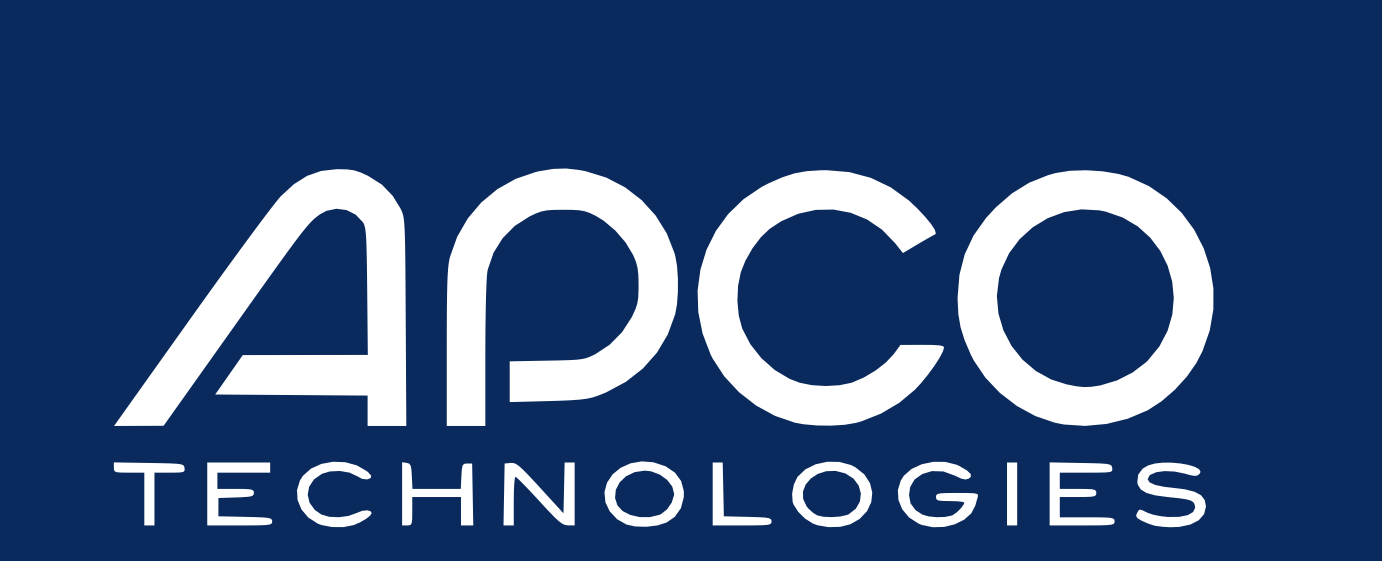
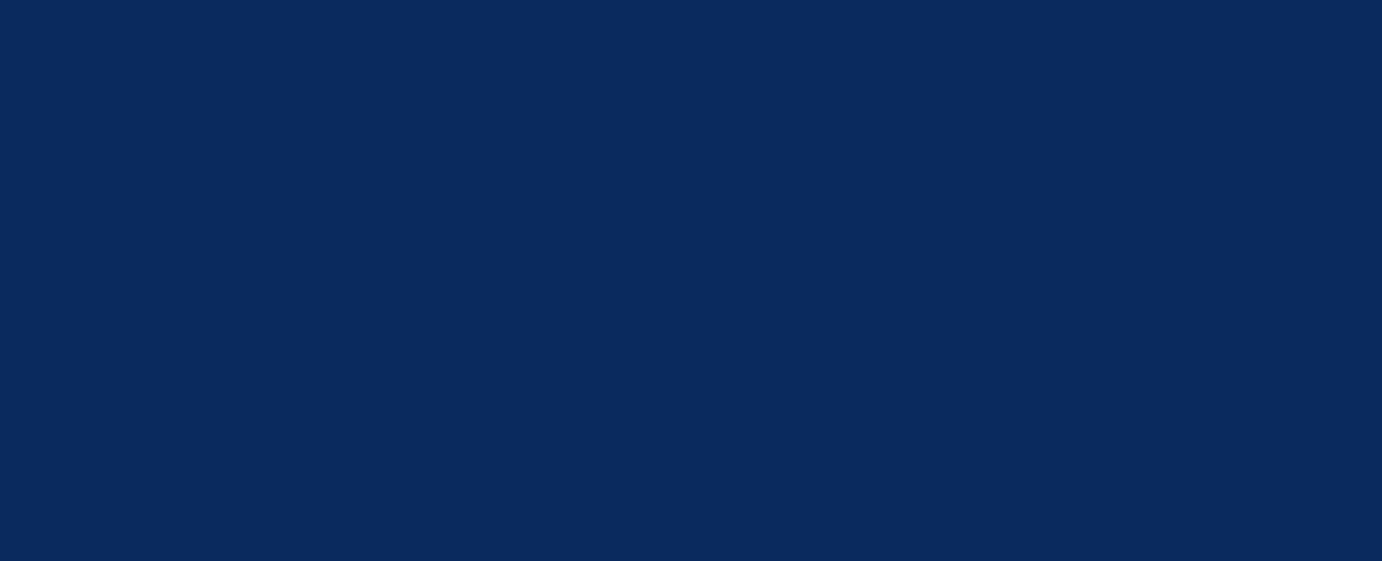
drawing: [113, 168, 1214, 528] -> none

